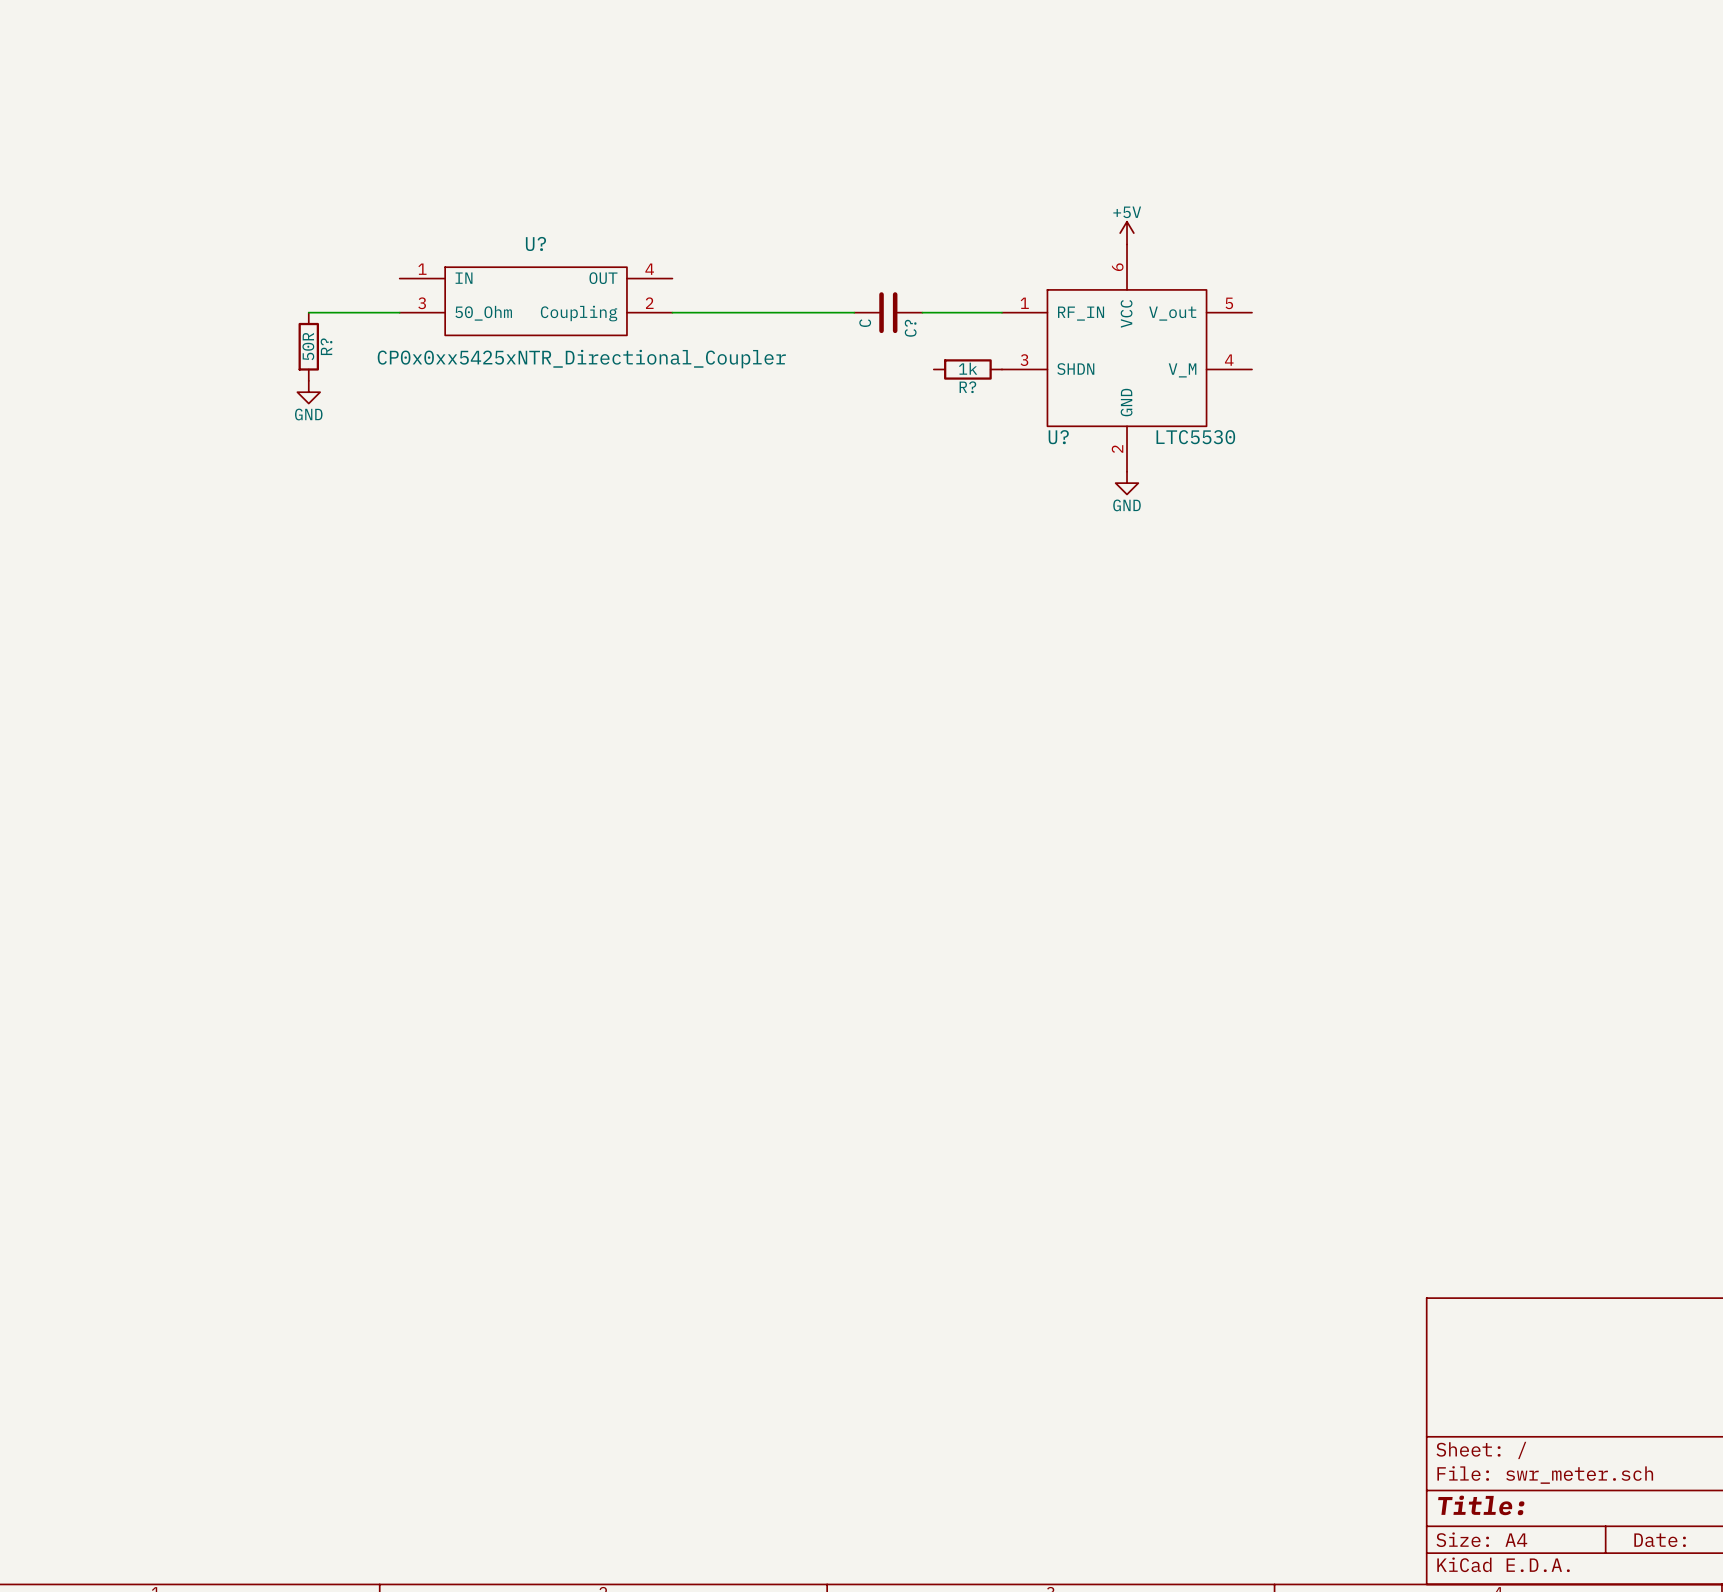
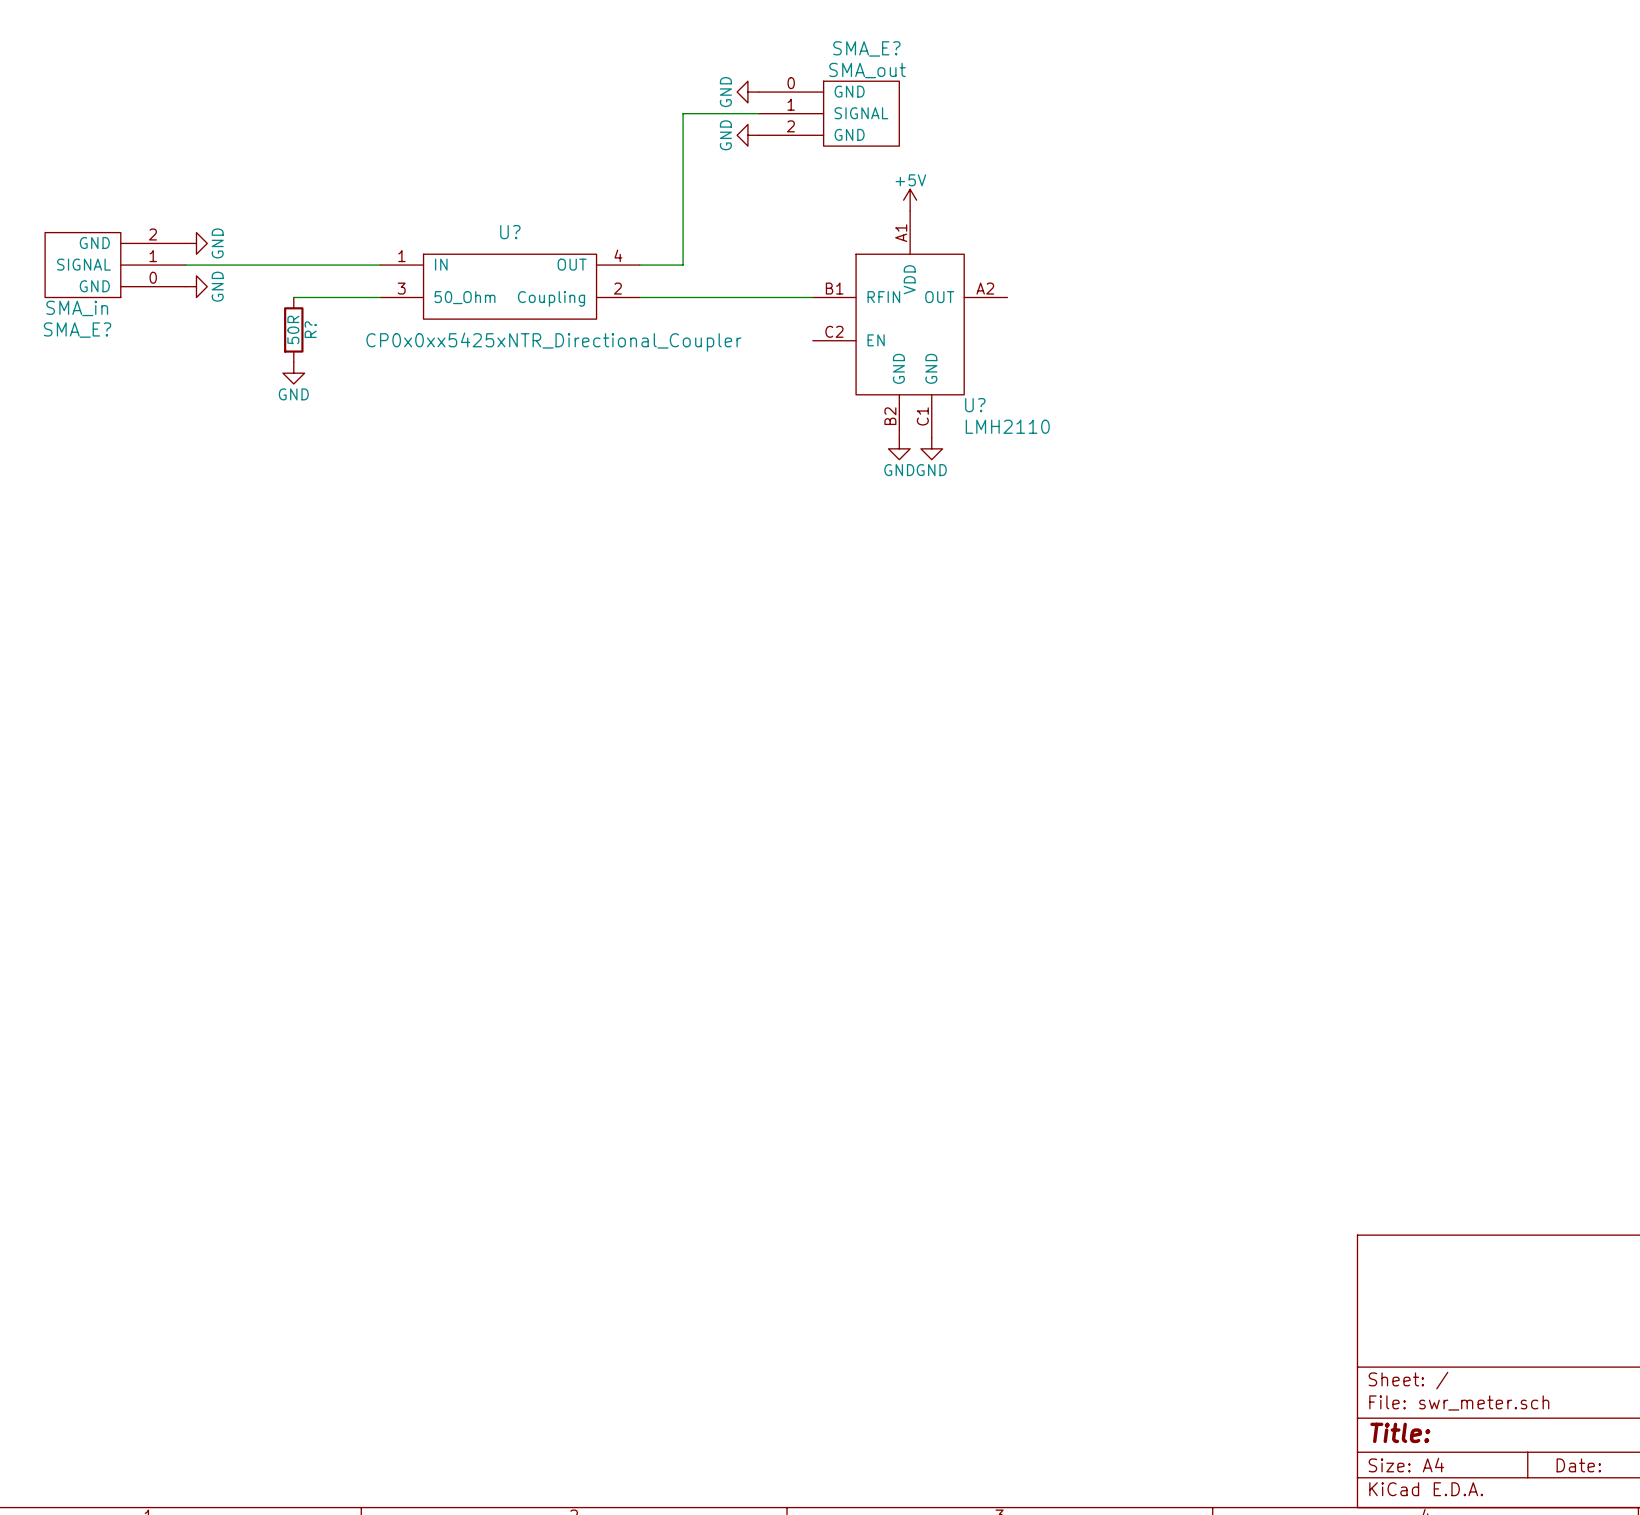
power symbol: none -> GND (747, 92)
wire: none -> (758, 113) (683, 113) (683, 265) (639, 265)
SMA_E?: none -> SMA_out (829, 113)
power symbol: none -> GND (747, 135)
power symbol position: +5V (1127, 233) -> +5V (910, 200)
power symbol: none -> GND (196, 243)
SMA_E?: none -> SMA_in (115, 265)
wire: none -> (185, 265) (380, 265)
power symbol: none -> GND (196, 286)
C?: C (888, 312) -> none
wire: (922, 312) (1001, 312) -> none
U?: none -> LMH2110 (910, 324)
U?: LTC5530 (1127, 358) -> none
R?: 1k (967, 369) -> none
power symbol: none -> GND (899, 448)
power symbol: none -> GND (931, 448)
power symbol: GND (1127, 483) -> none

